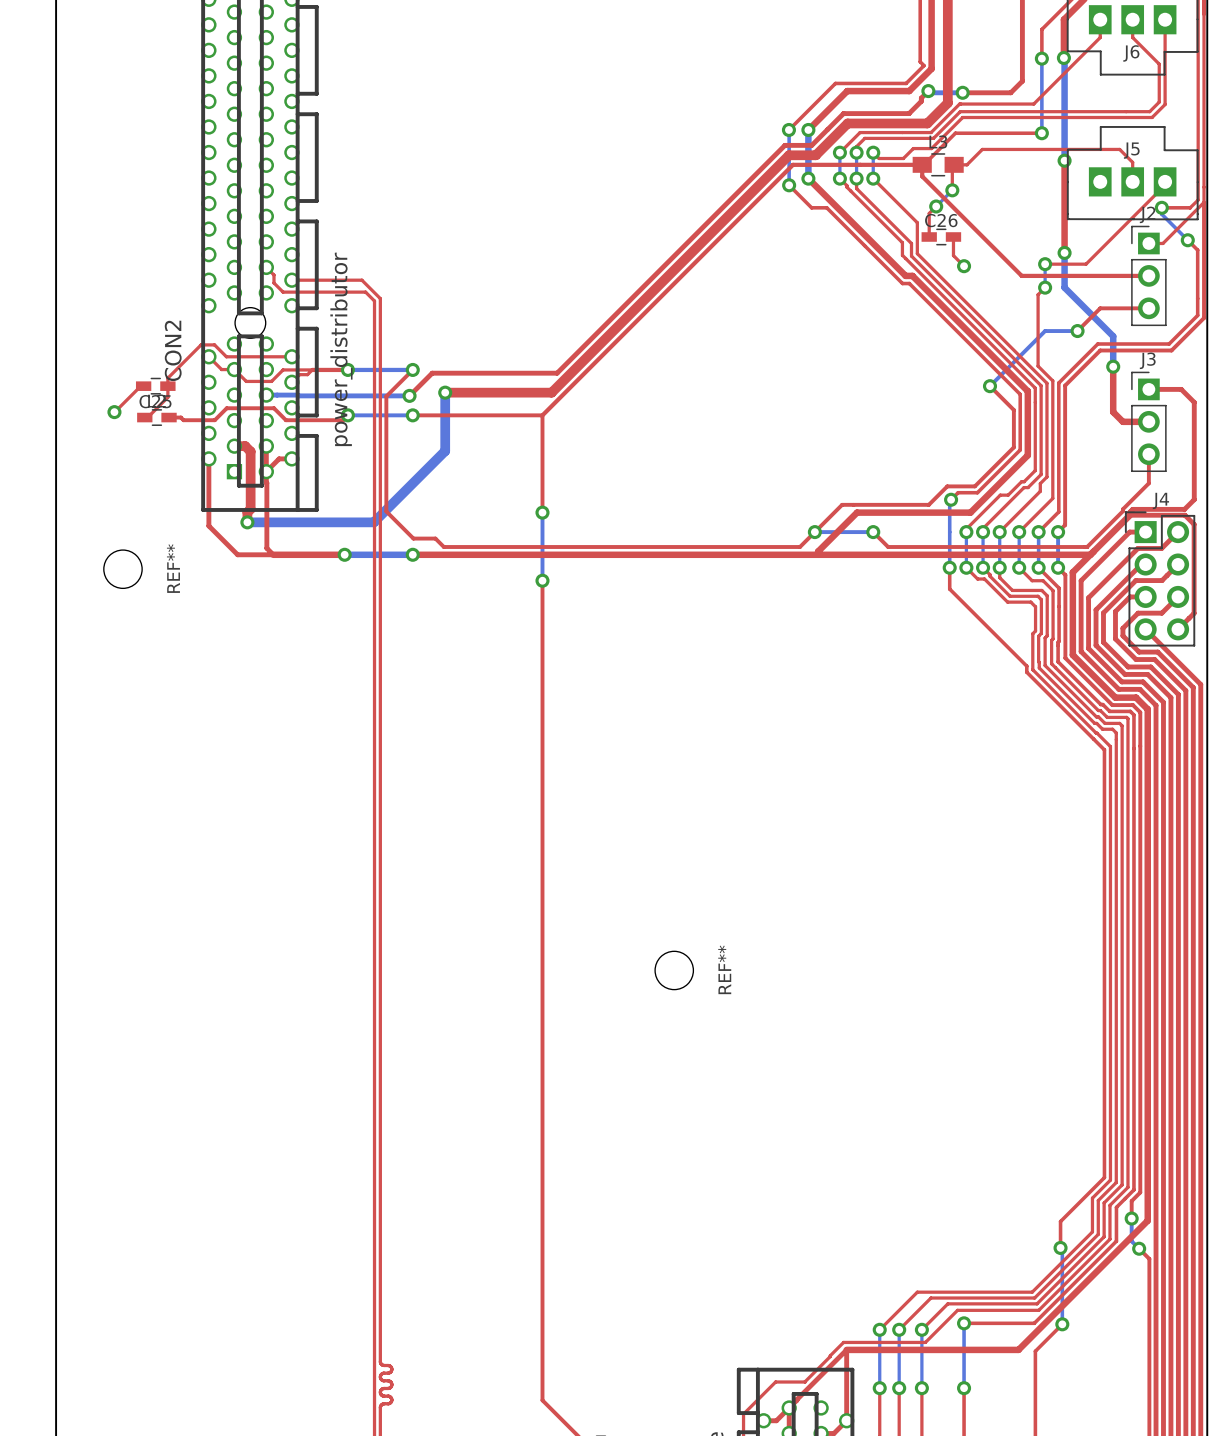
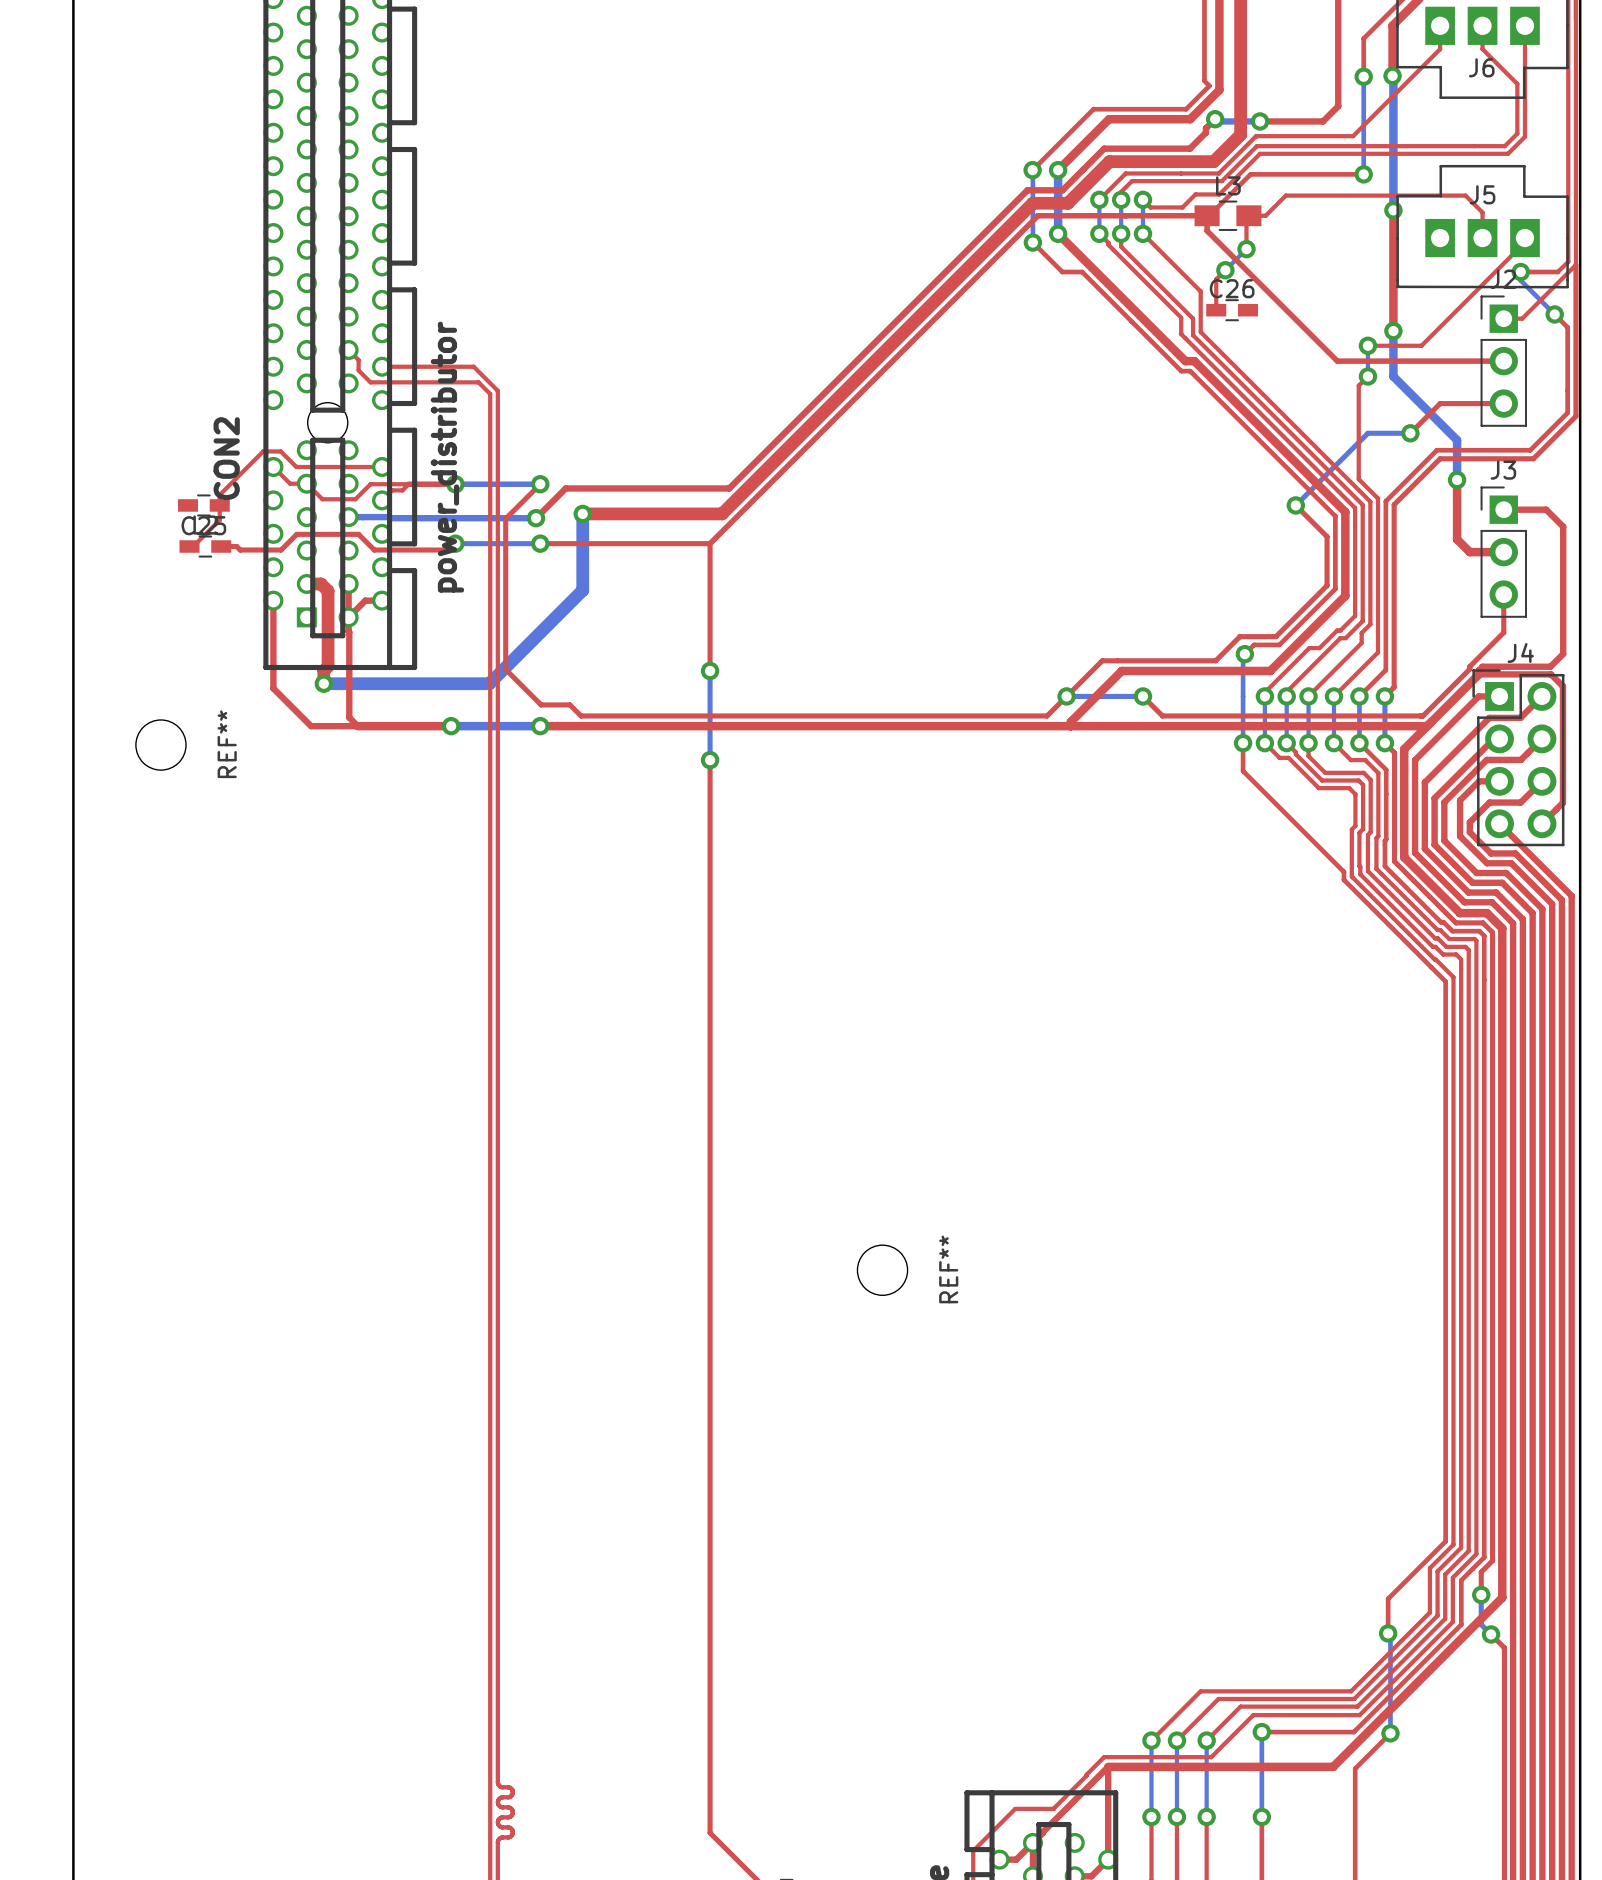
top track: (953, 236) (953, 255) (964, 266) -> none
via: (964, 266) -> none
top track: (143, 386) (140, 386) (114, 412) -> none
via: (114, 412) -> none

